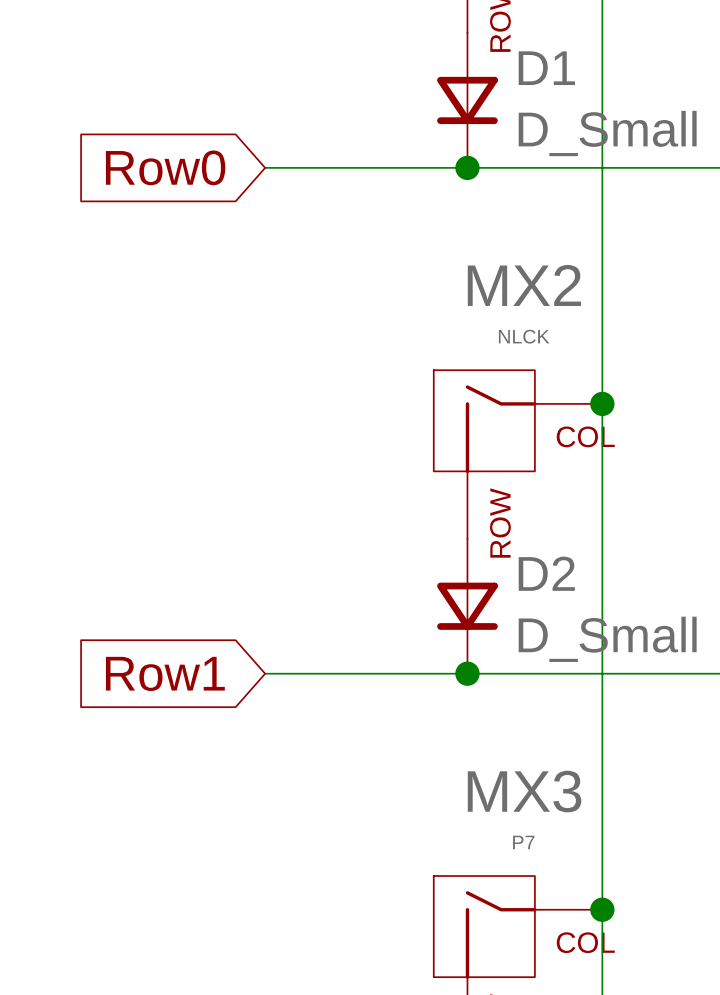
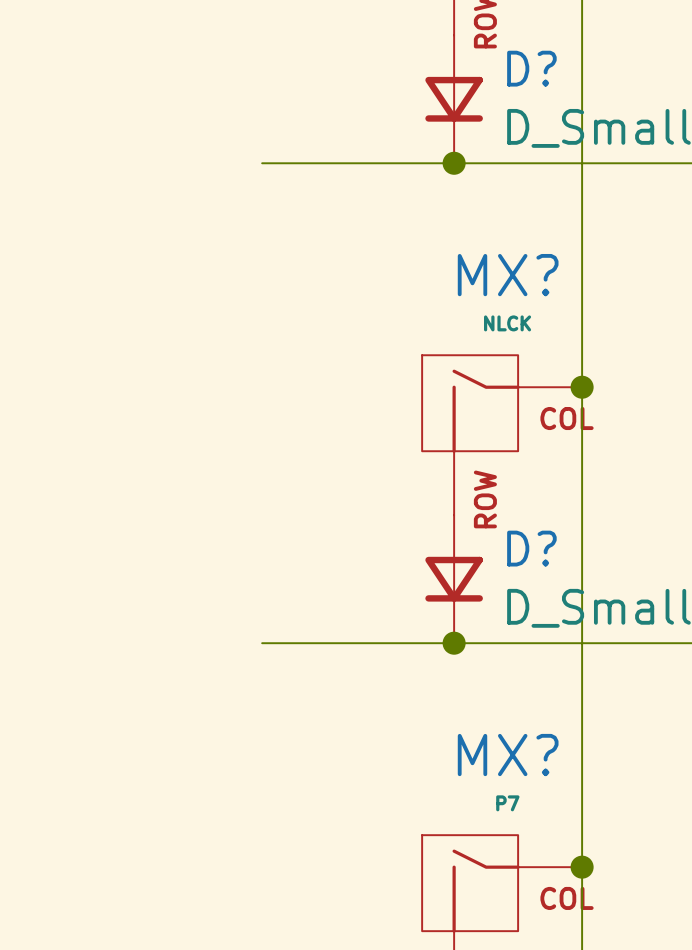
D1 name: D1 (546, 68) -> D? (531, 68)
global label: Row0 (165, 167) -> none
MX2 name: MX2 (524, 285) -> MX? (508, 275)
D2 name: D2 (546, 573) -> D? (531, 548)
global label: Row1 (165, 673) -> none
MX3 name: MX3 (524, 791) -> MX? (508, 755)

